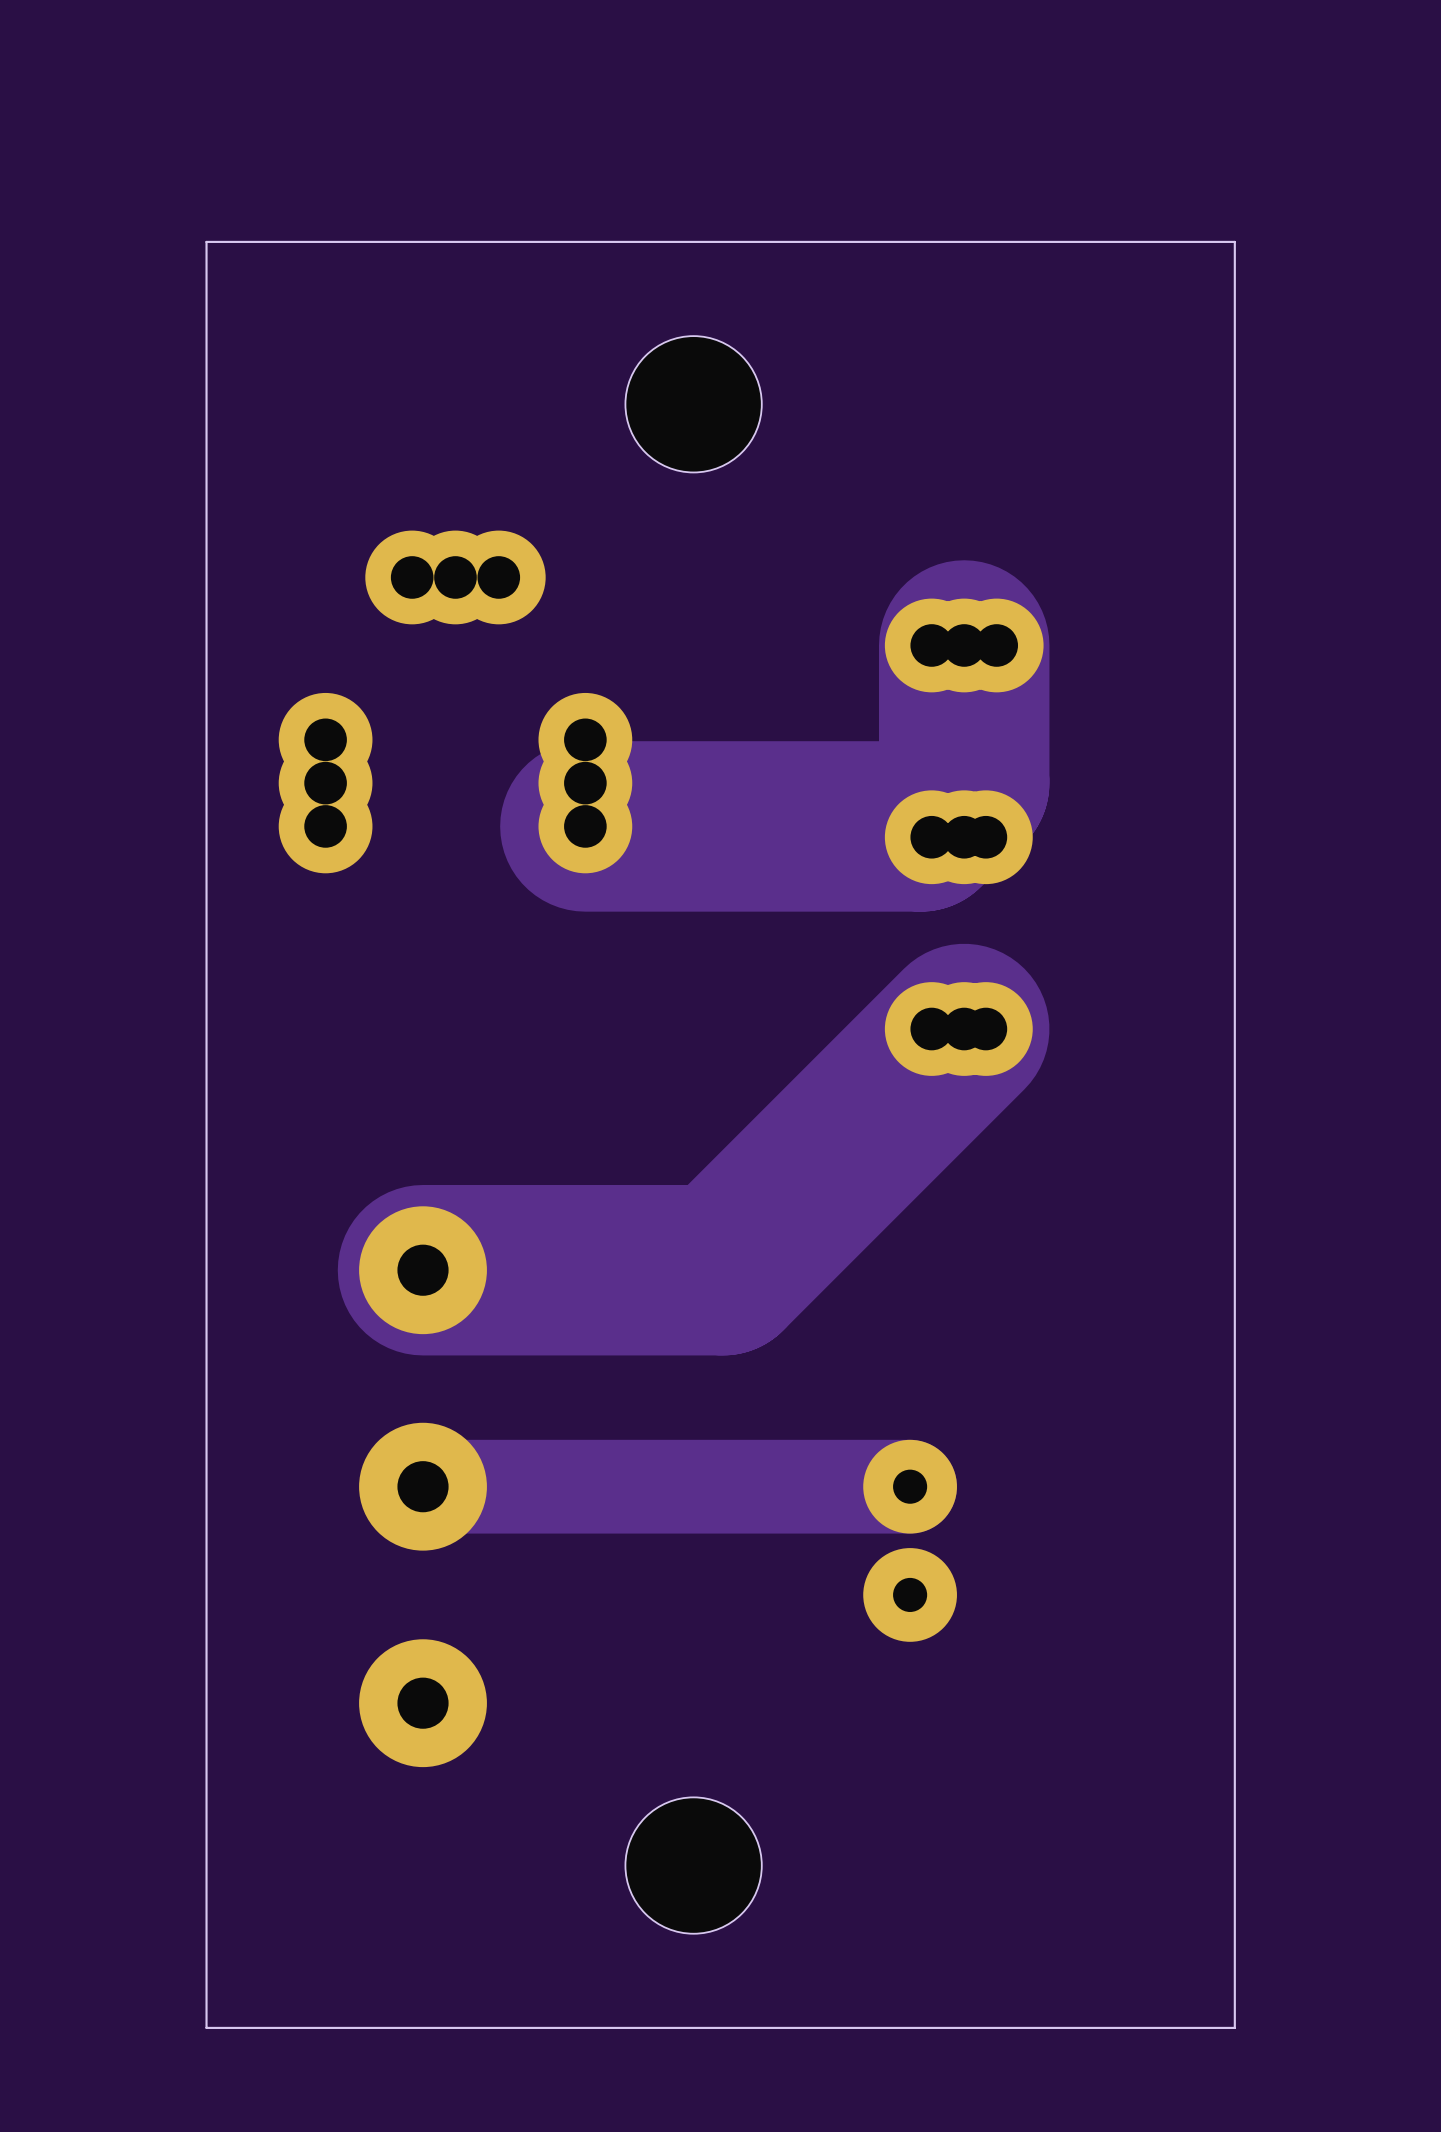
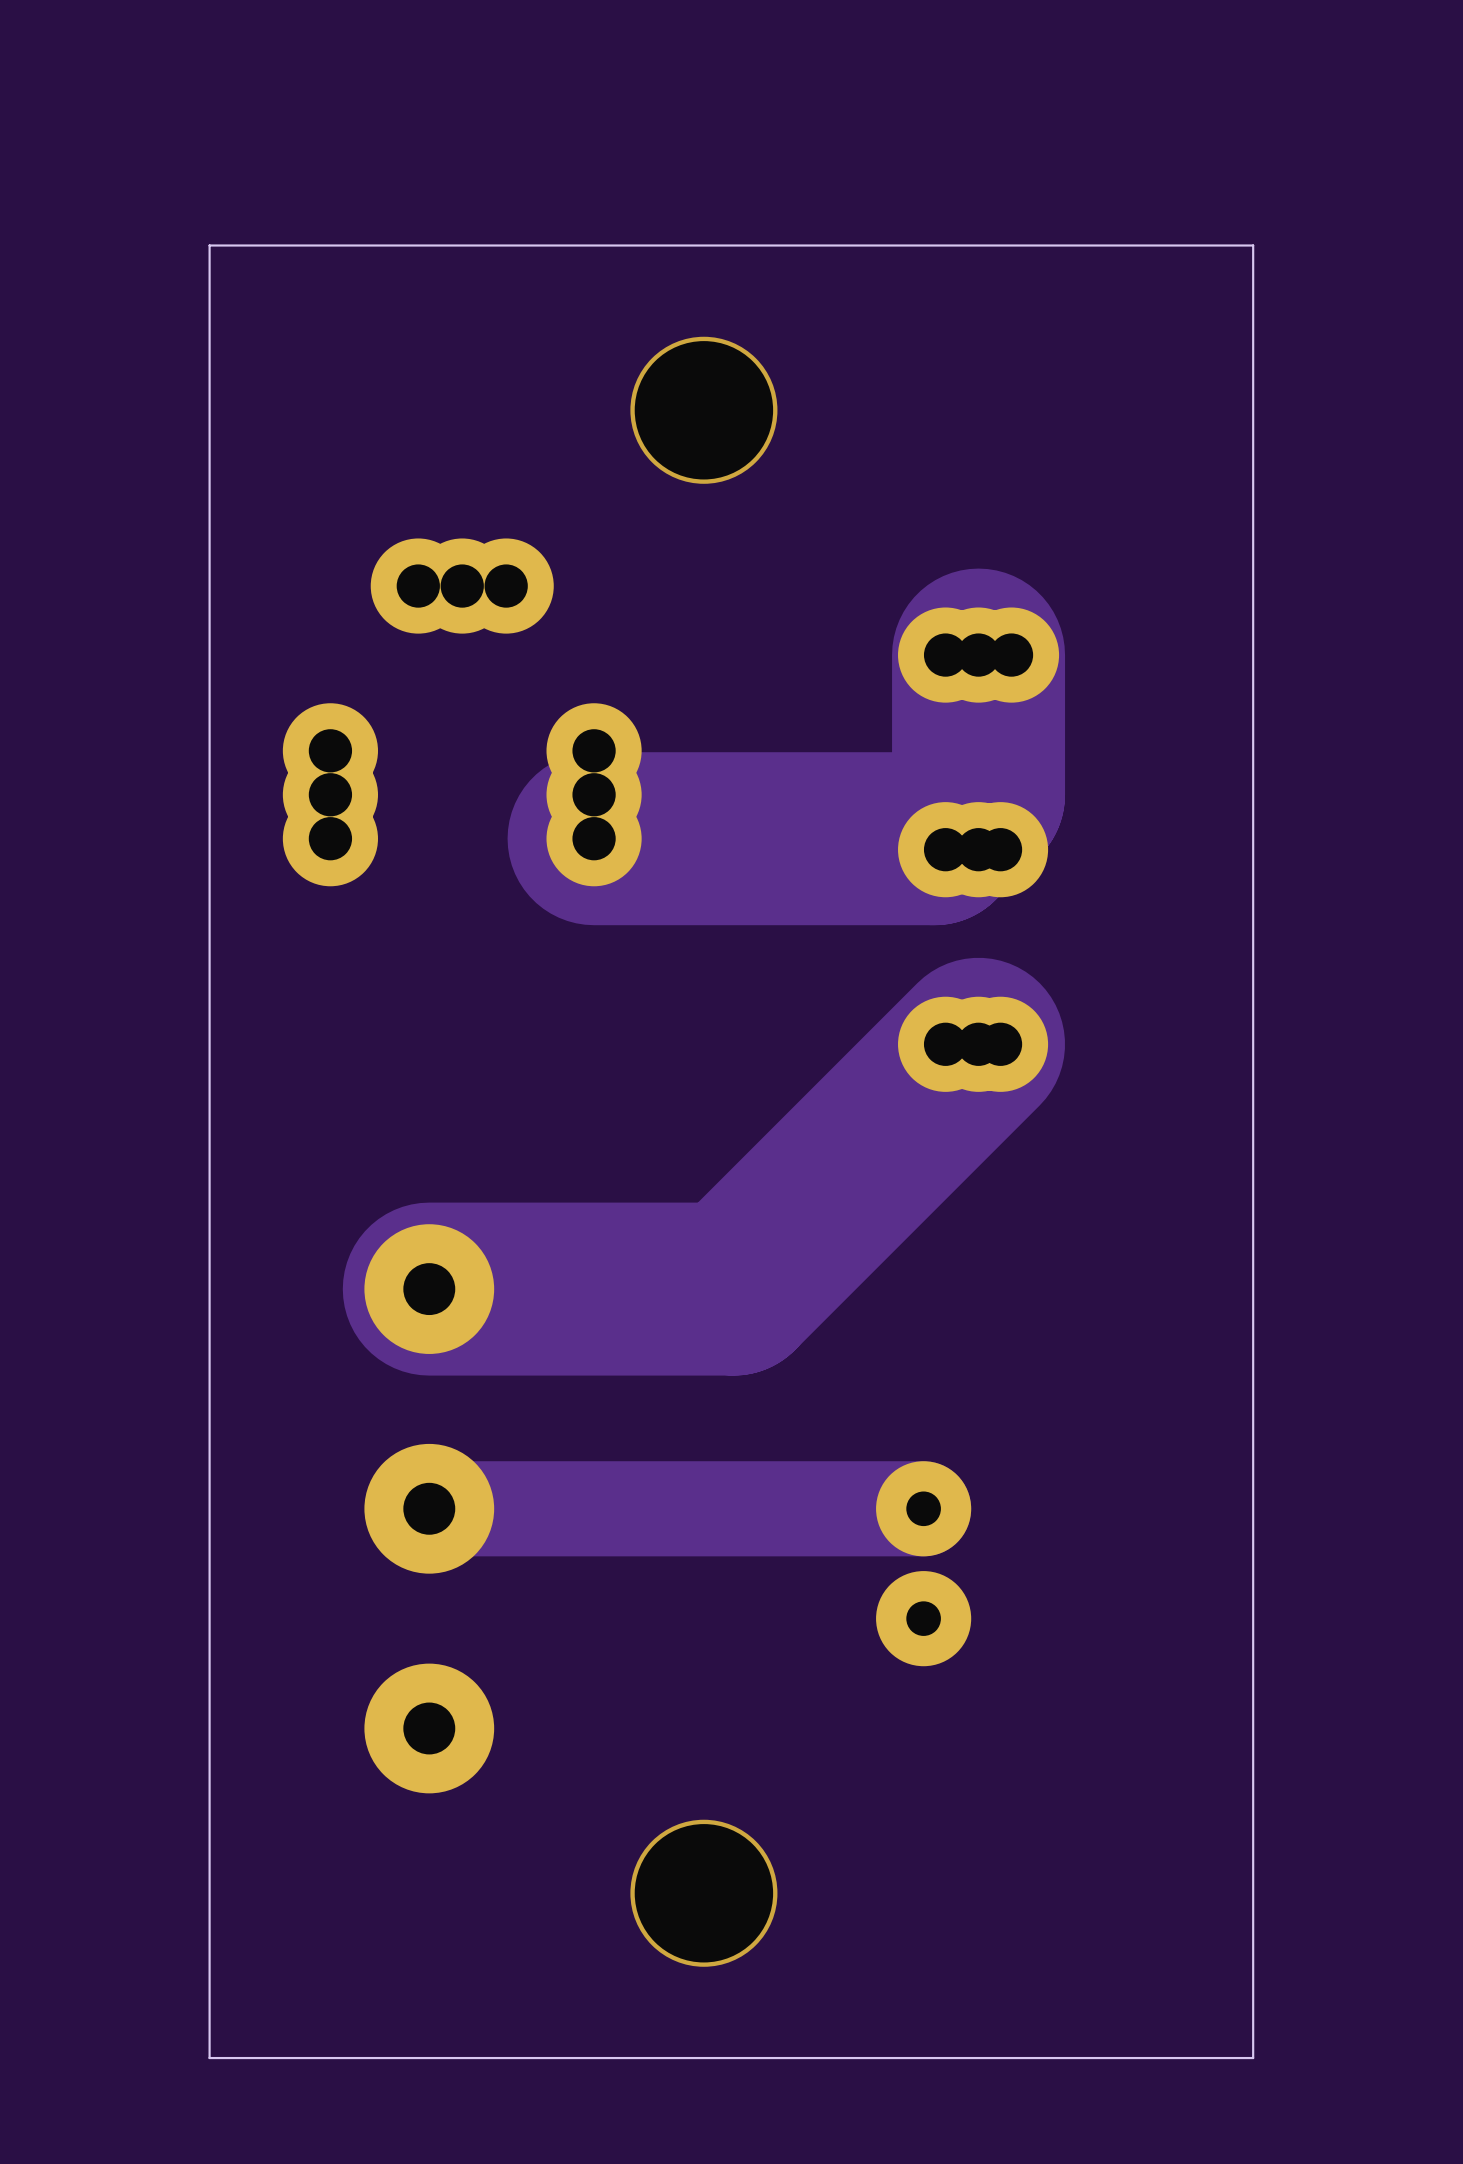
part: (693, 404) -> none
via: none -> (703, 410)
part: (693, 1865) -> none
via: none -> (703, 1893)

